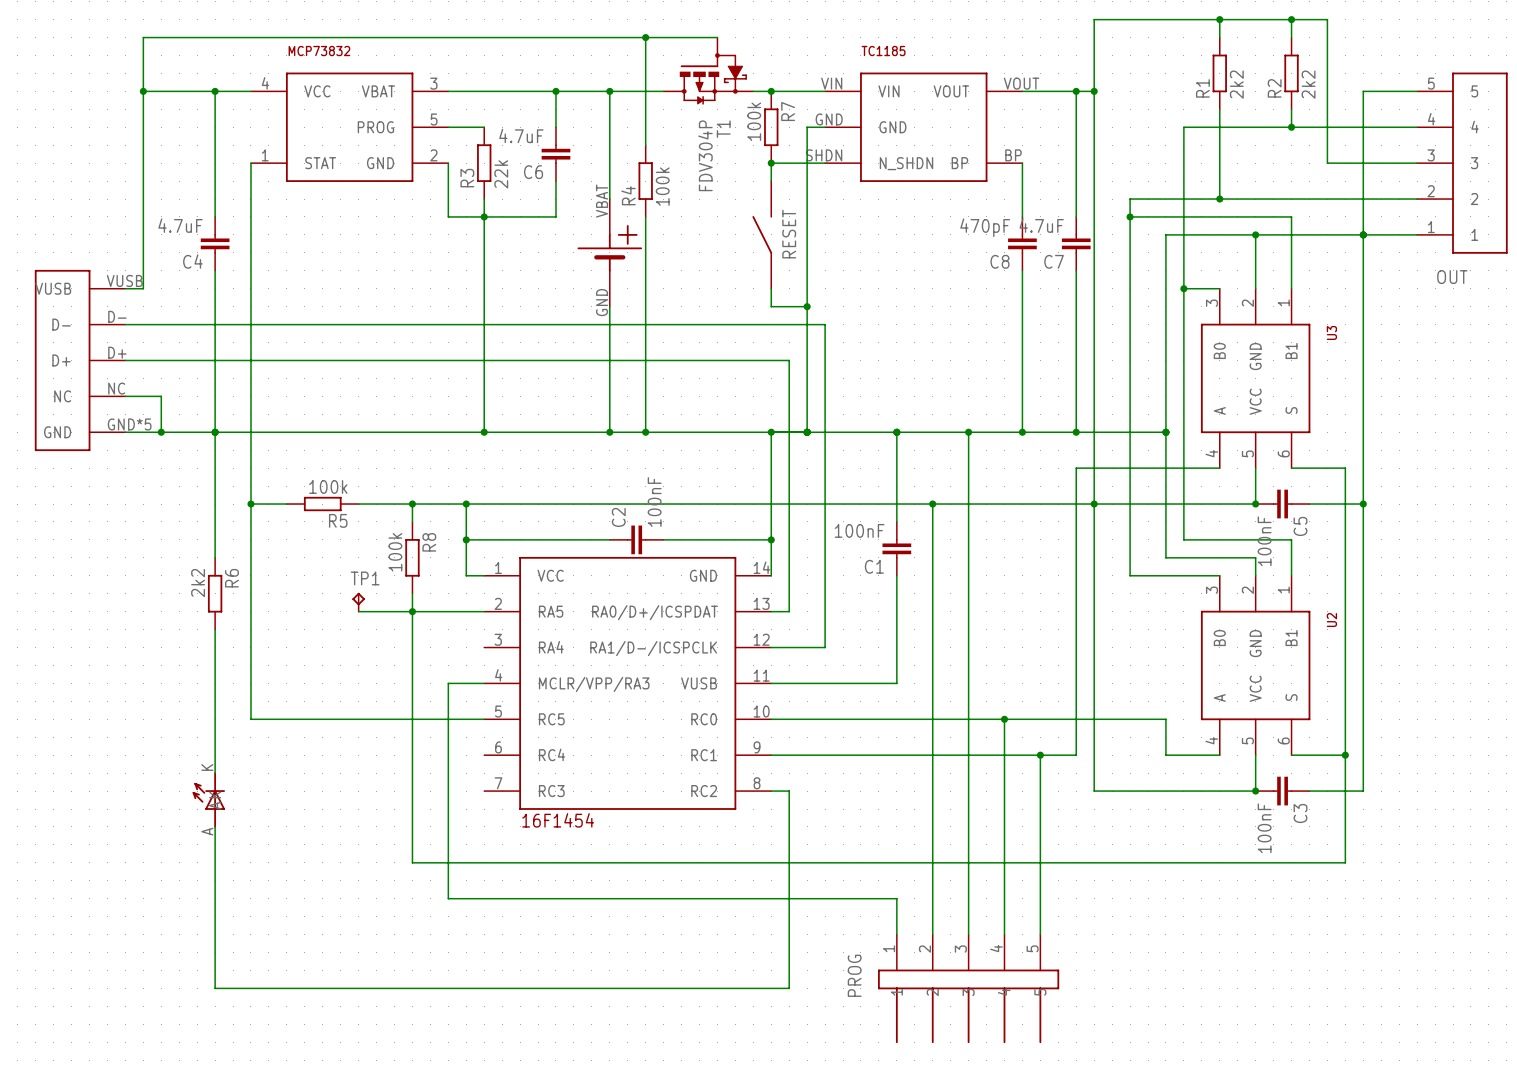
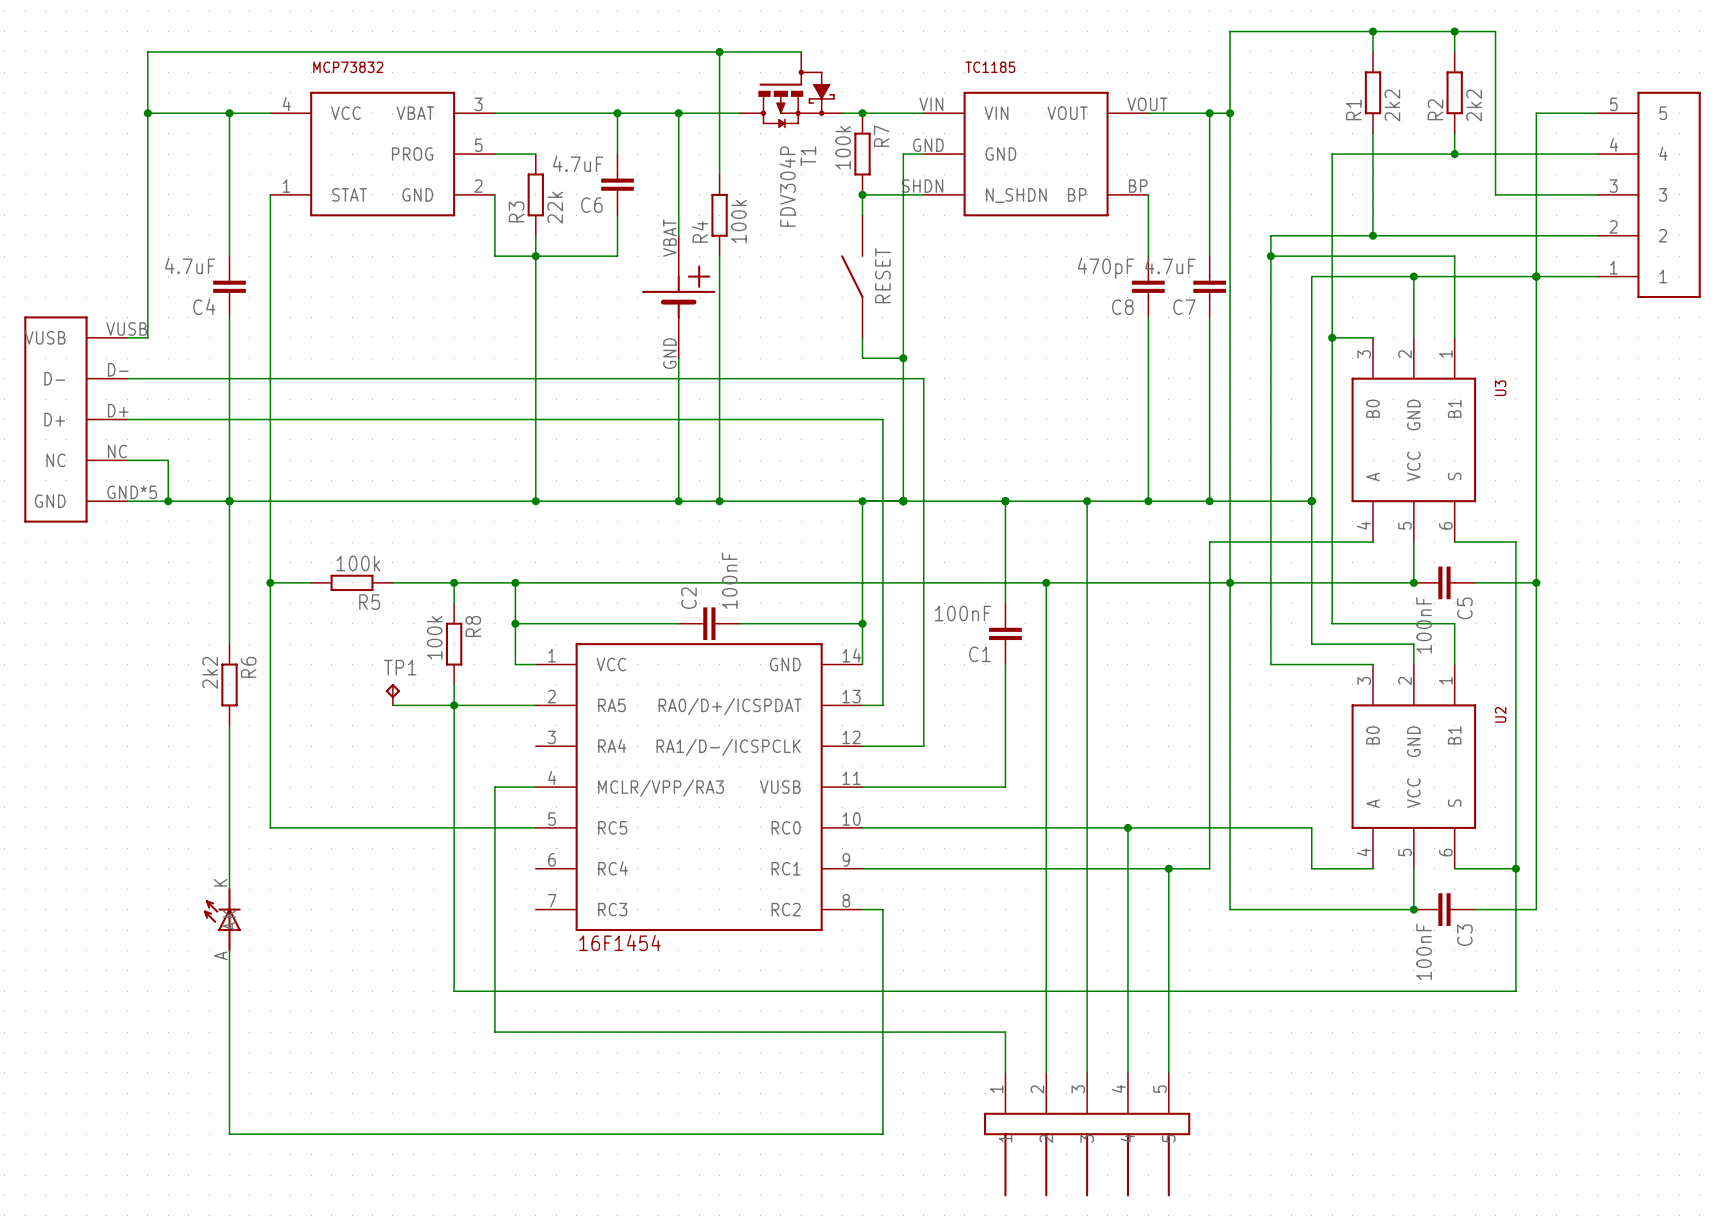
OUT name: OUT (1452, 277) -> none
PROG name: PROG (854, 975) -> none

